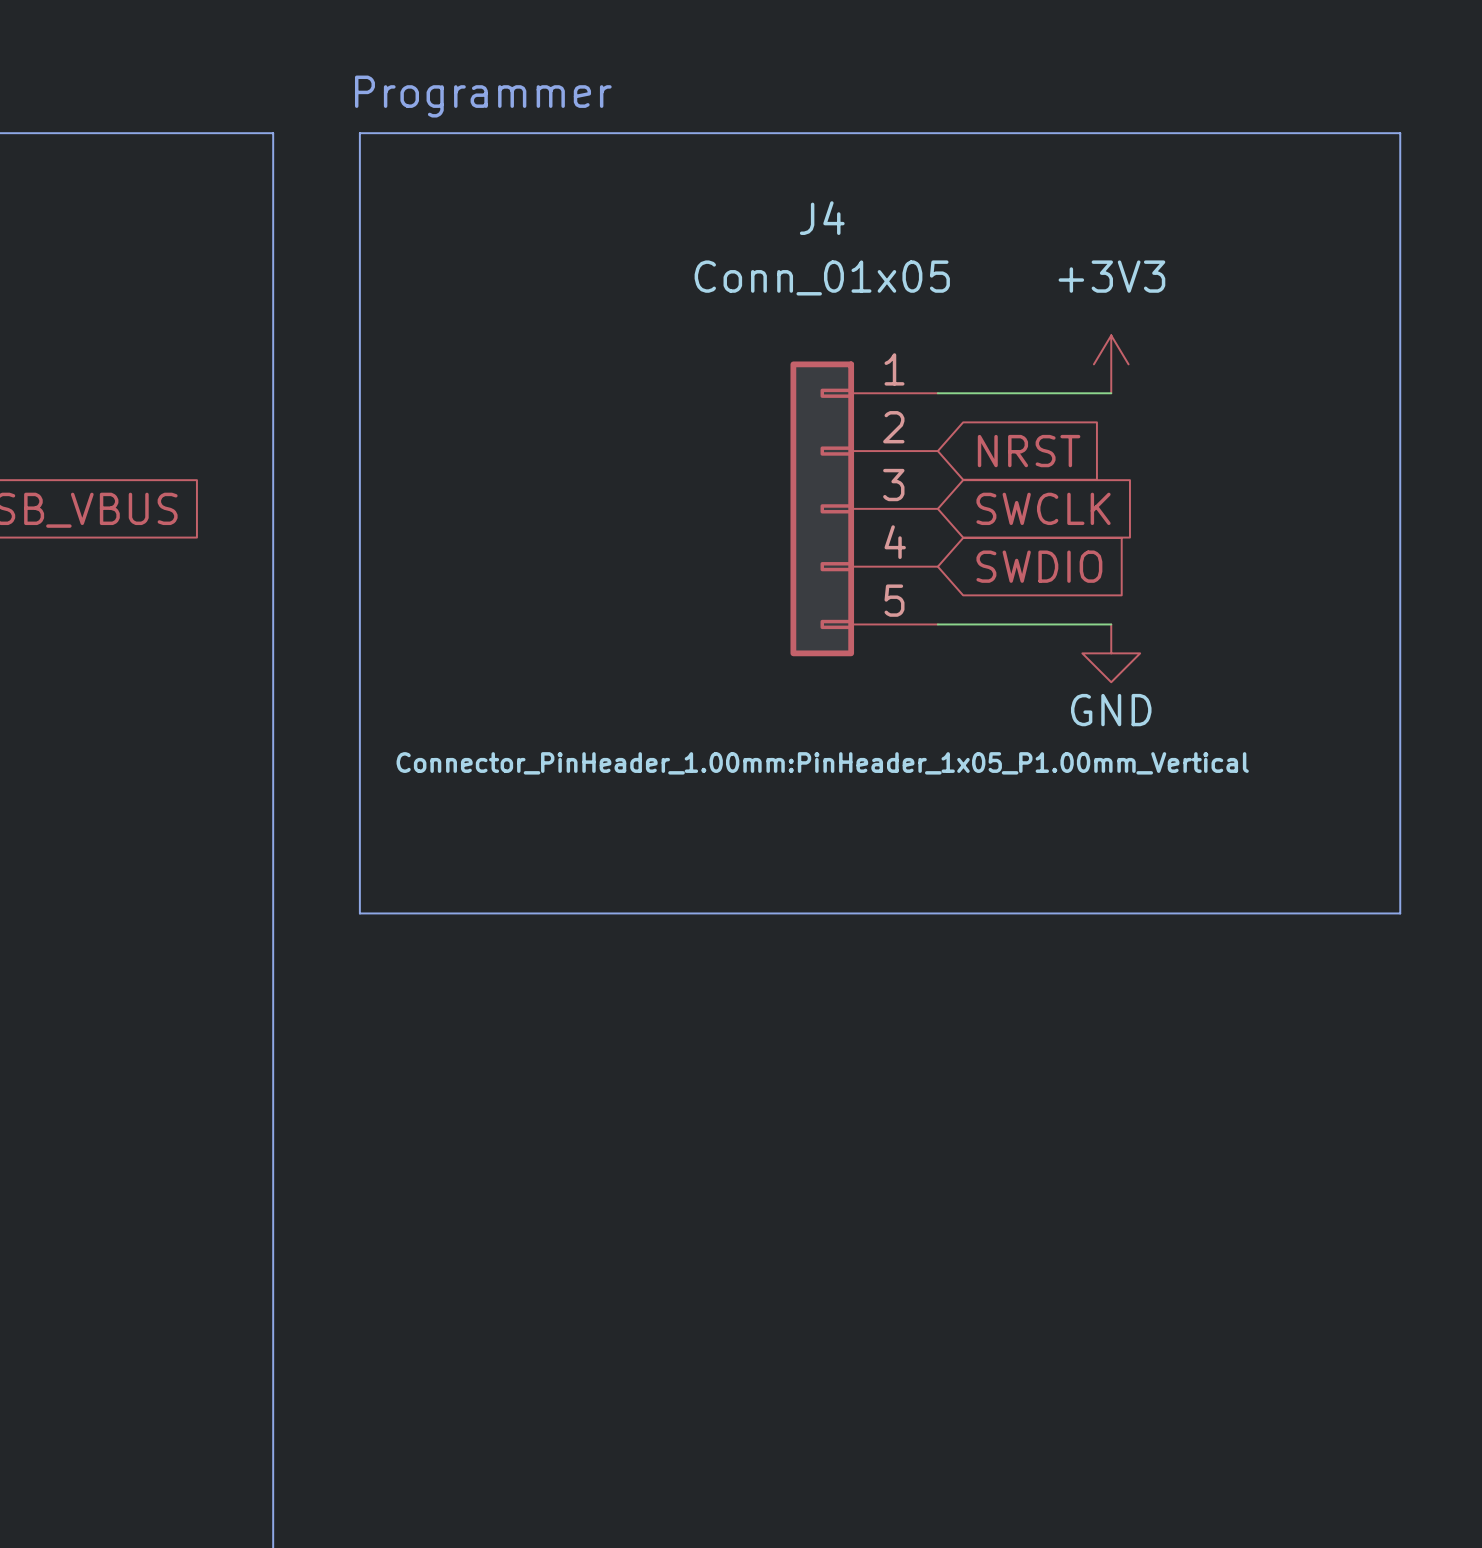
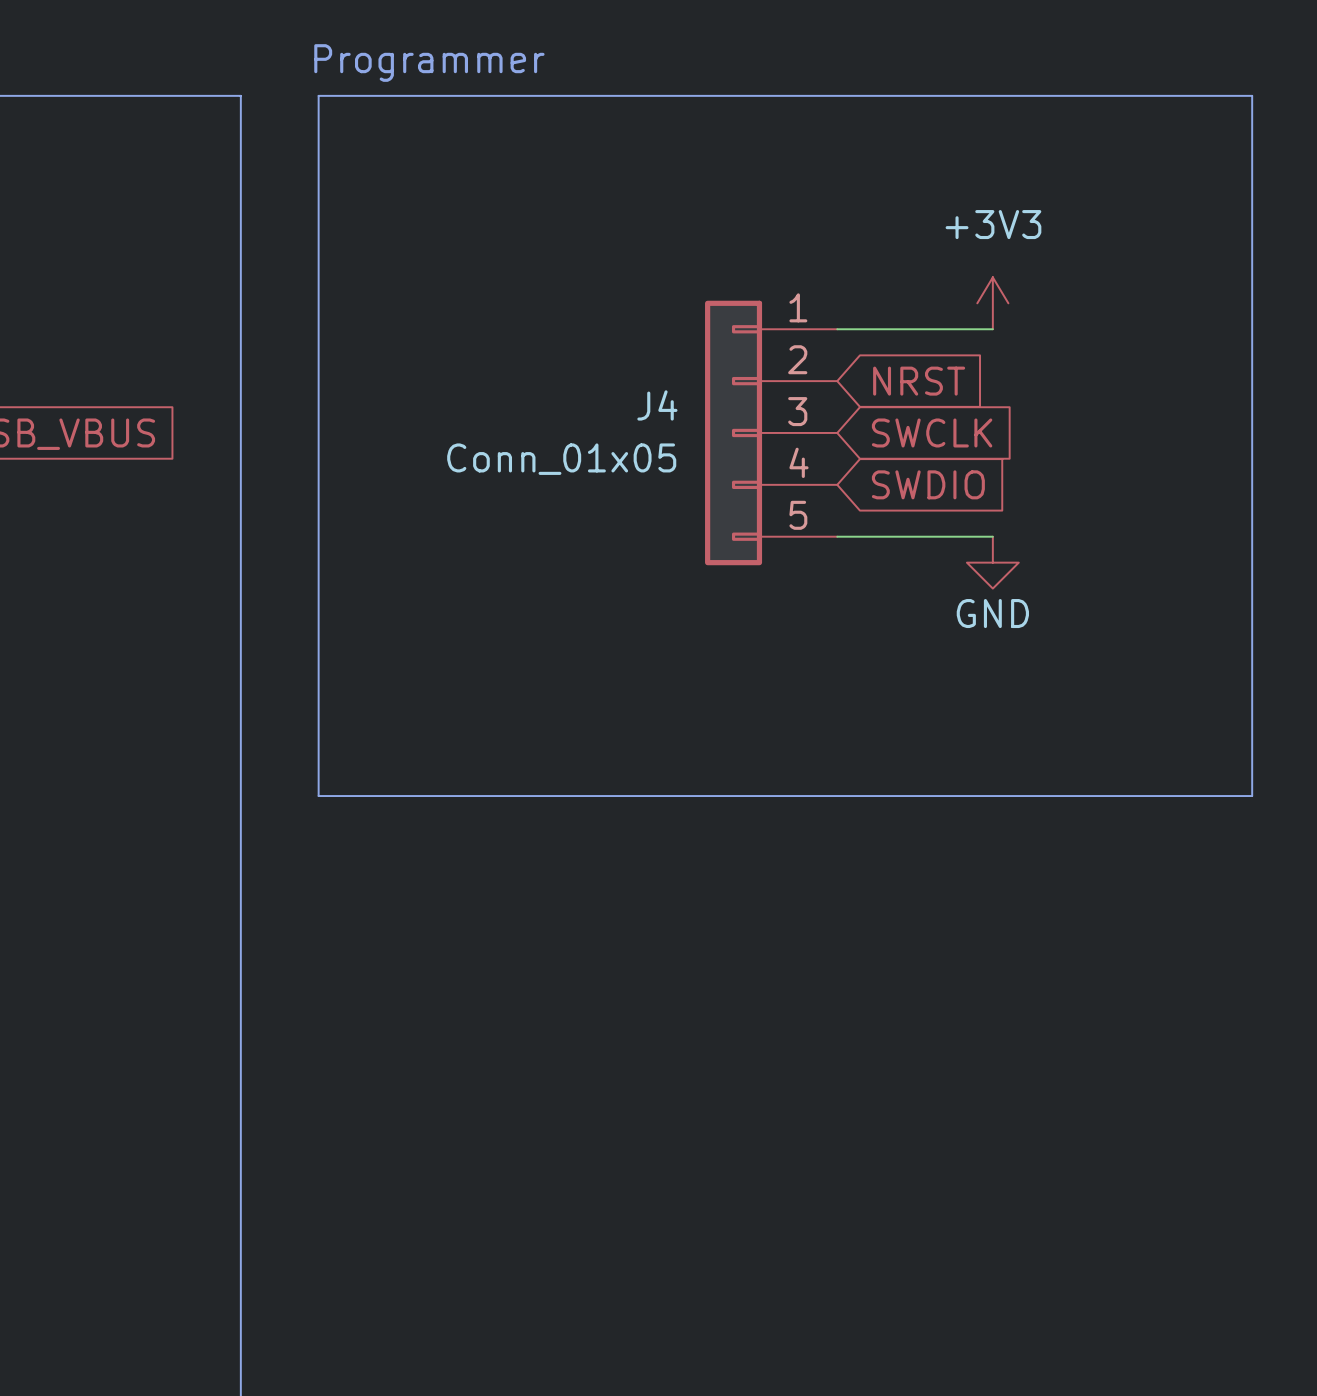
J4 name position: J4 (822, 218) -> J4 (657, 405)
J4 value position: Conn_01x05 (822, 277) -> Conn_01x05 (561, 459)
J4 text: Connector_PinHeader_1.00mm:PinHeader_1x05_P1.00mm_Vertical (822, 763) -> none

